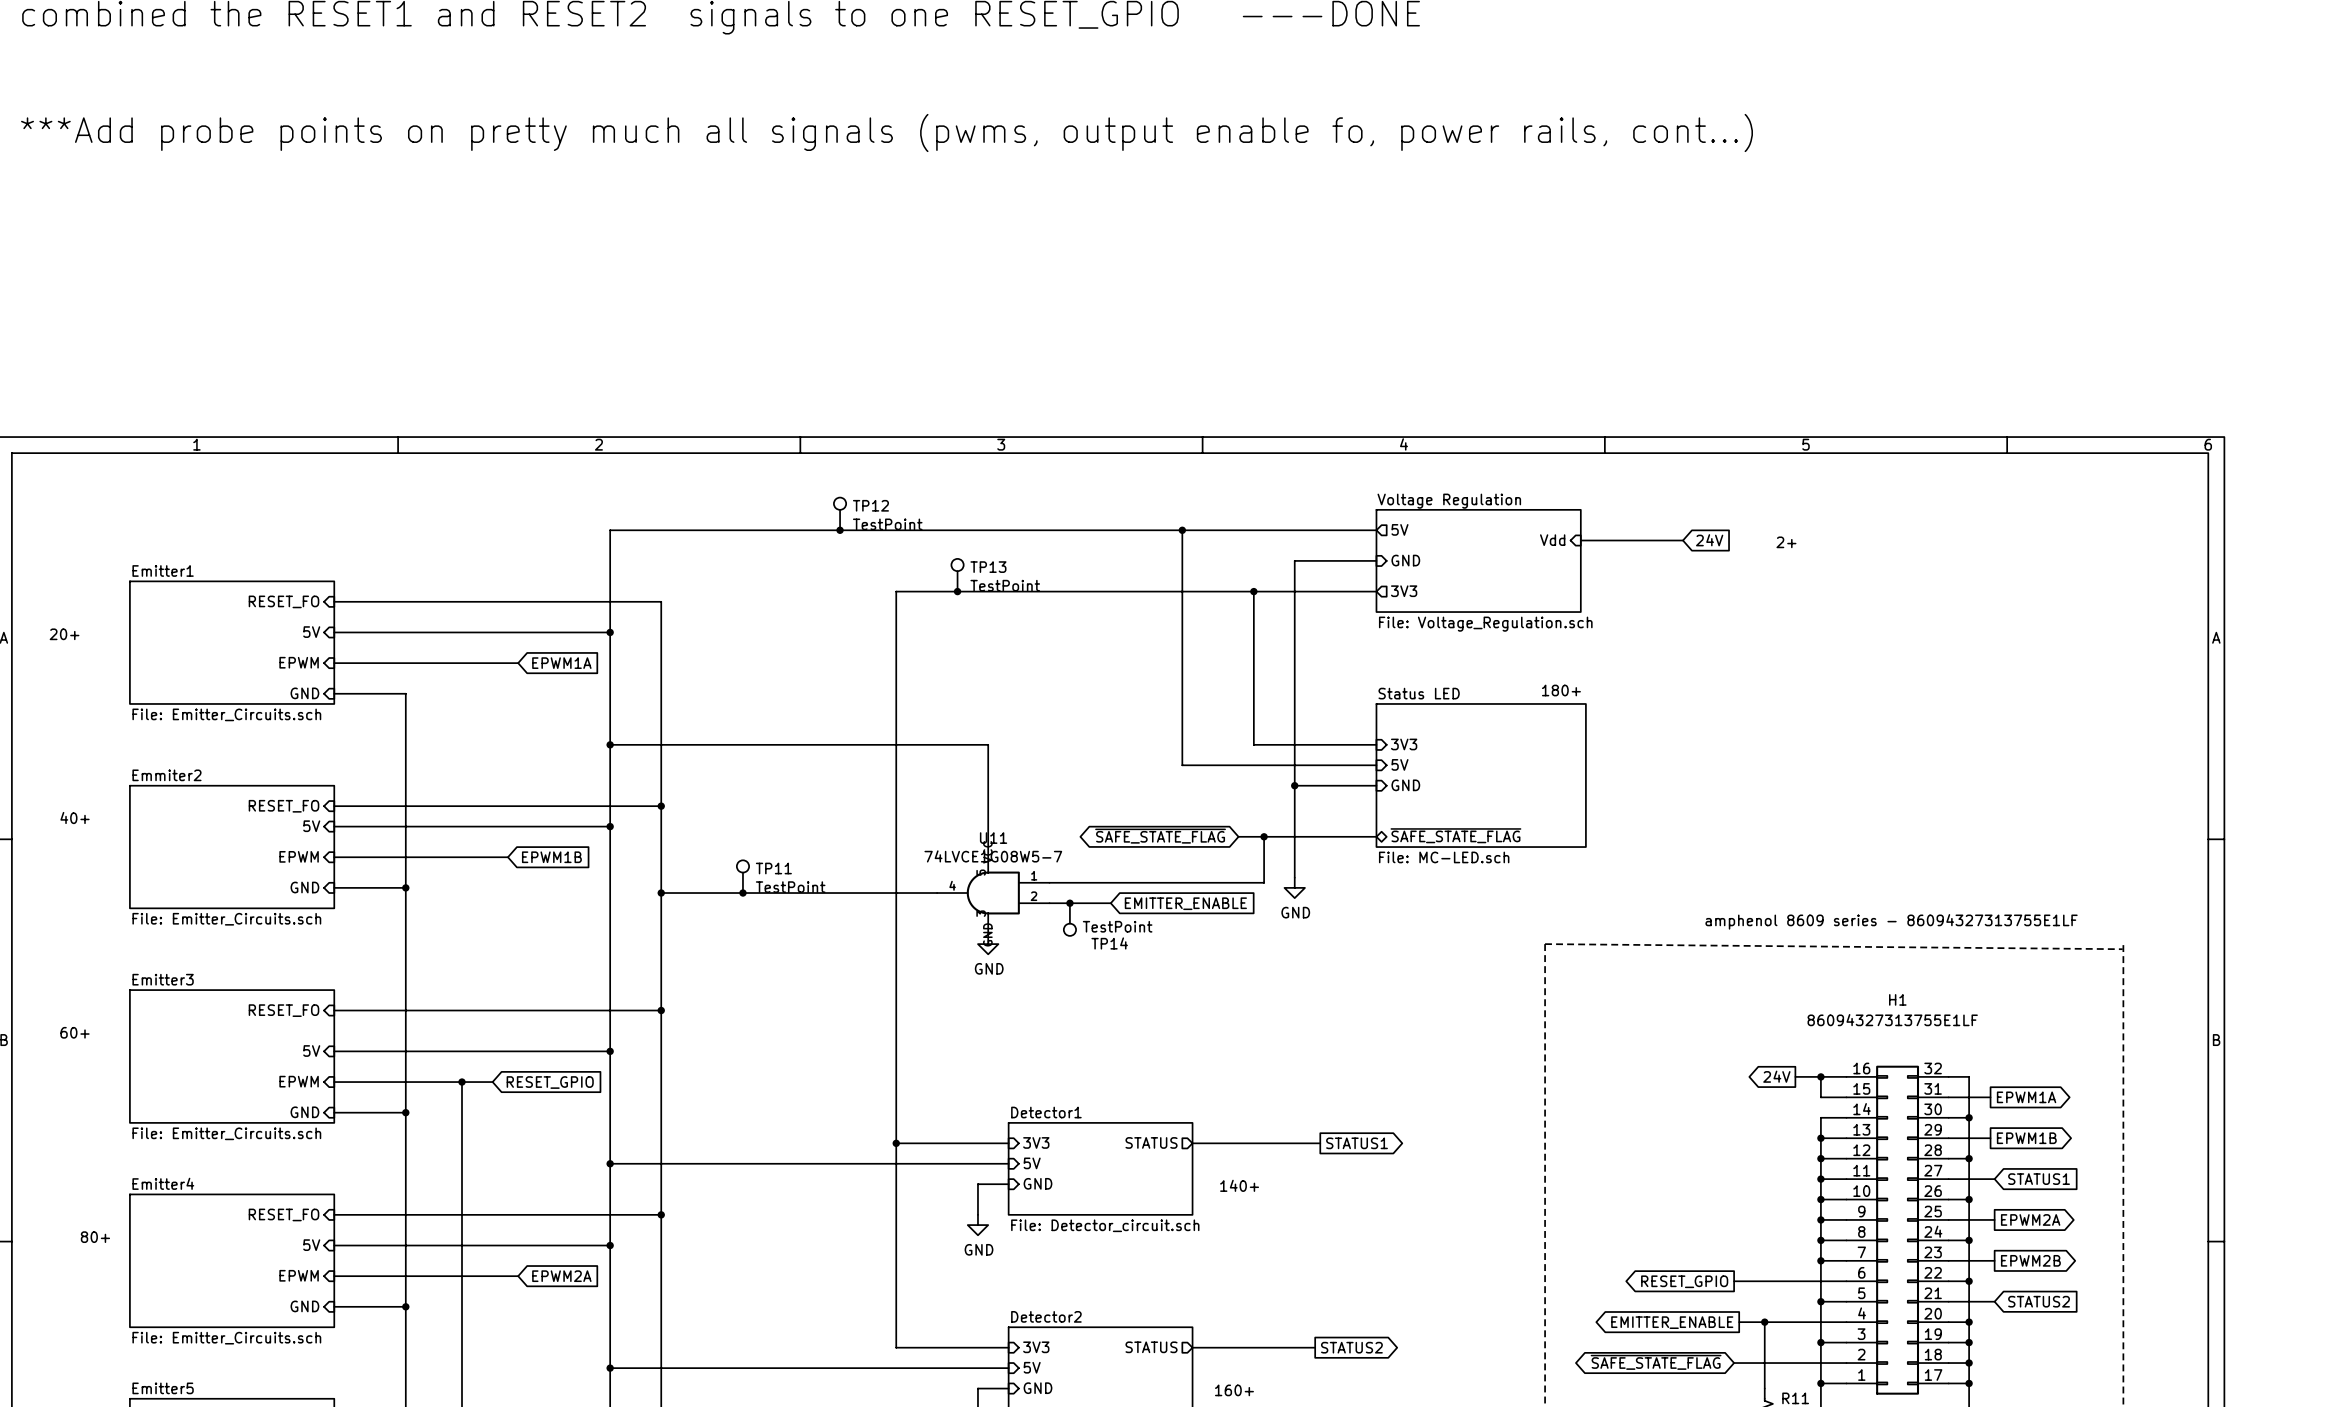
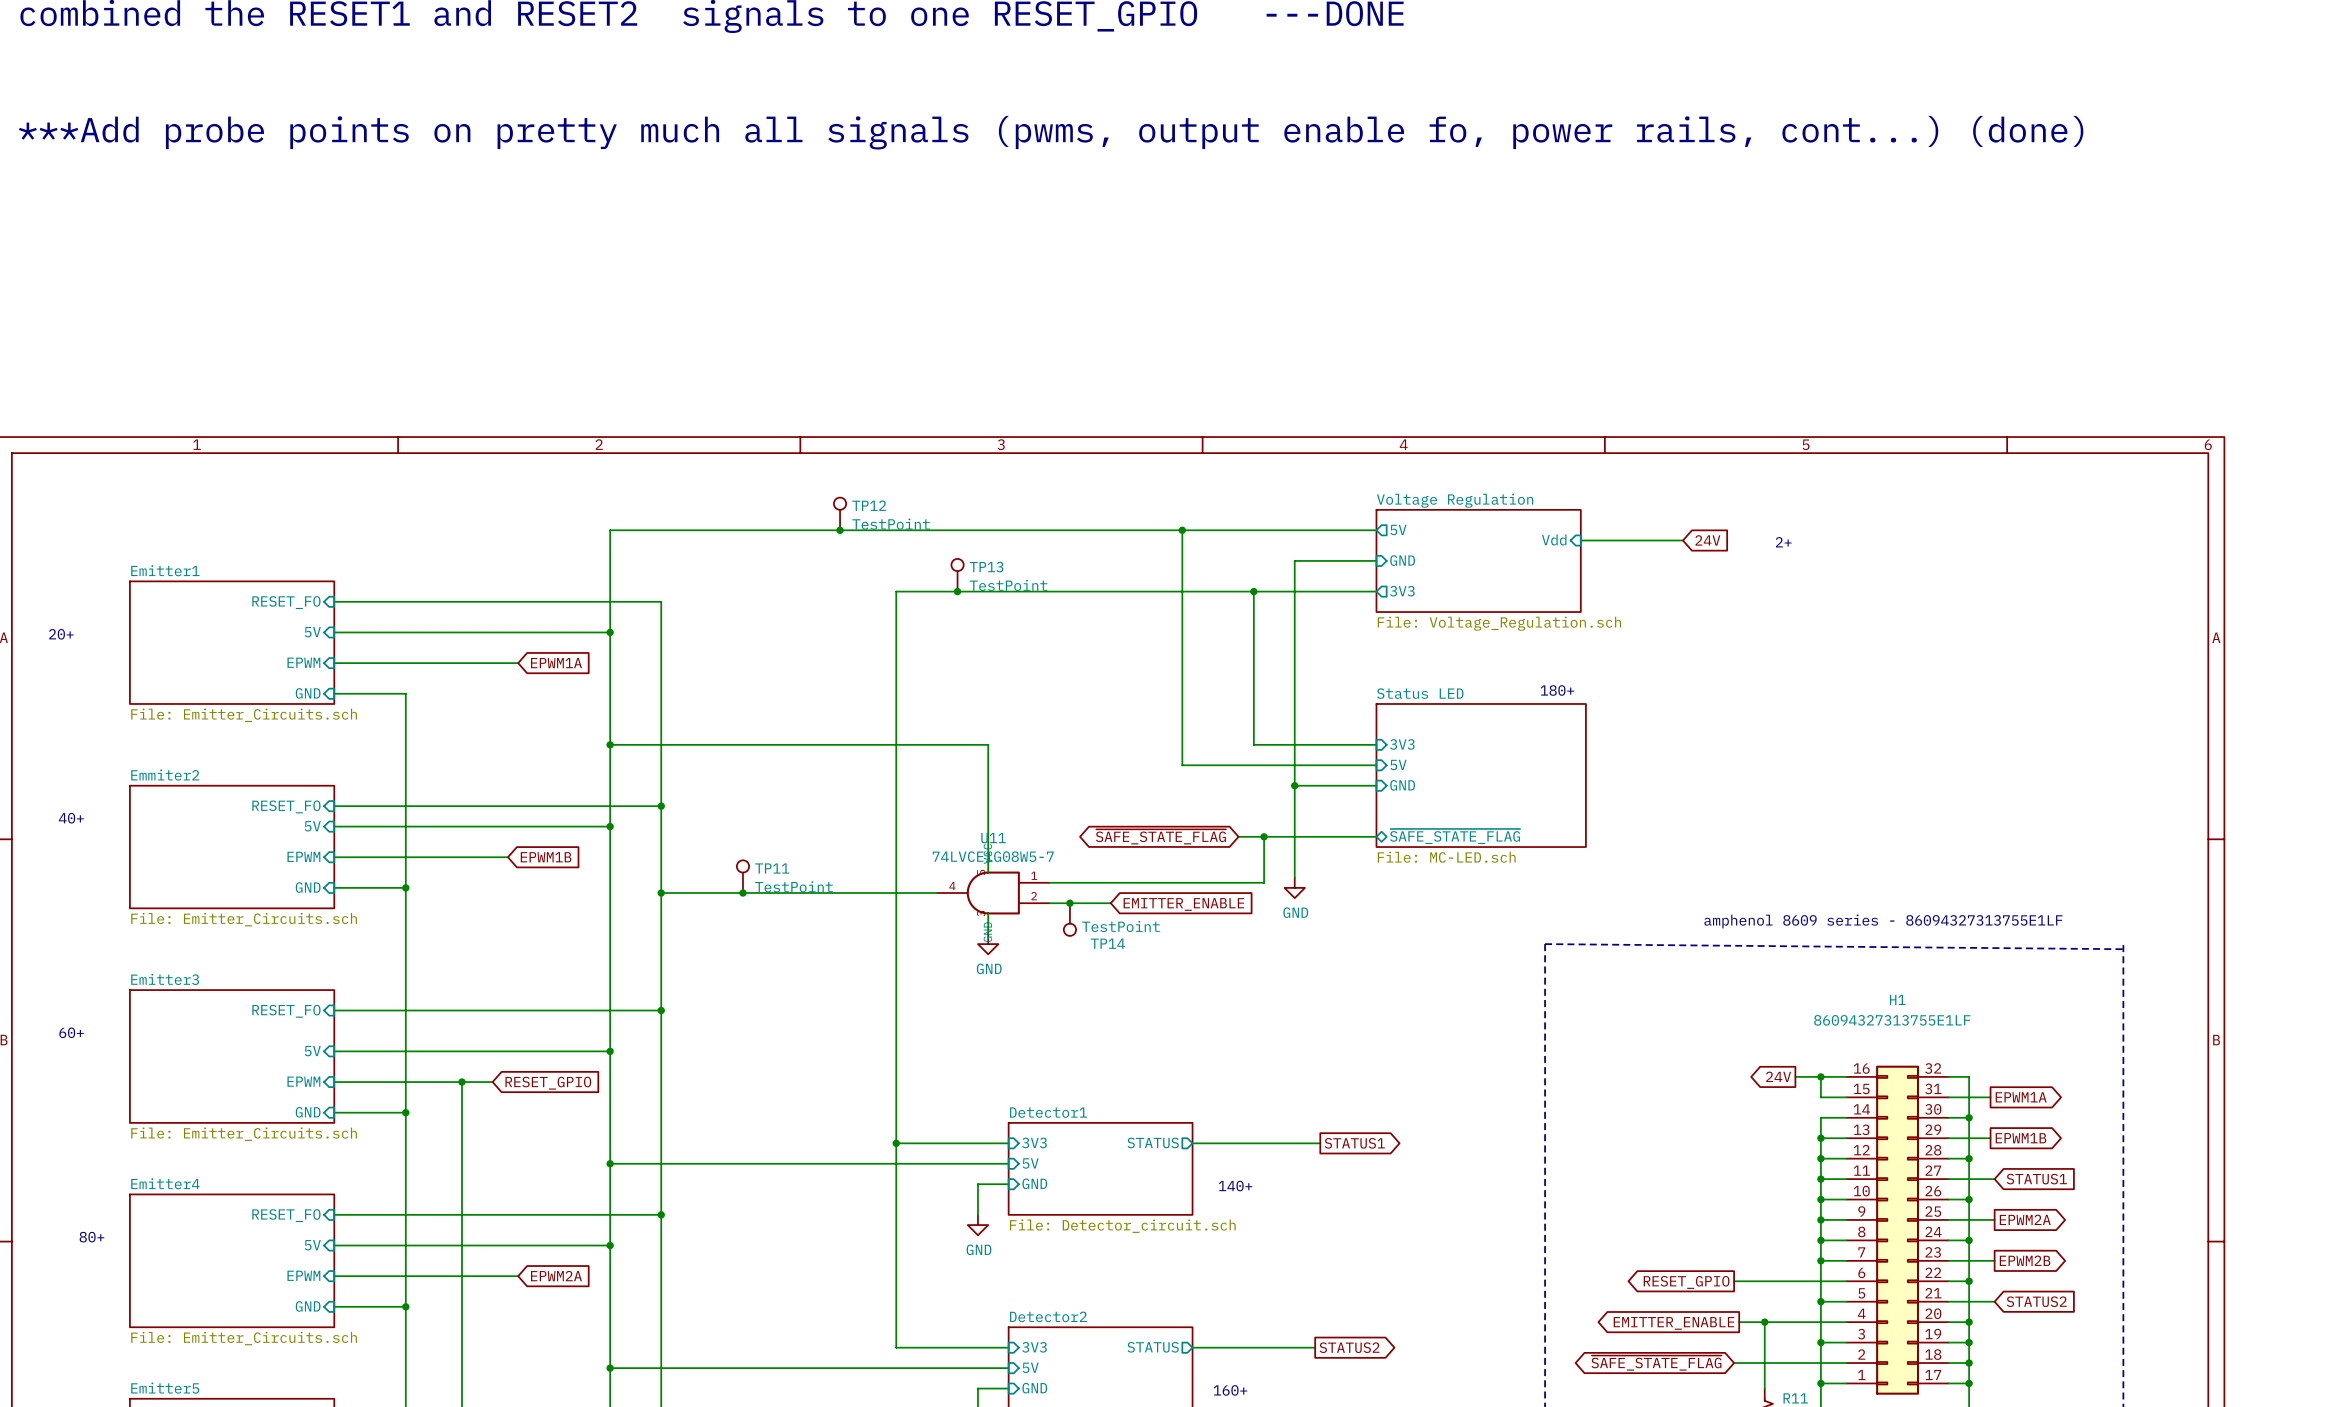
text: ***Add probe points on pretty much all signals (pwms, output enable fo, power rails, cont...) (887, 132) -> ***Add probe points on pretty much all signals (pwms, output enable fo, power rails, cont...) (done) (1051, 132)

